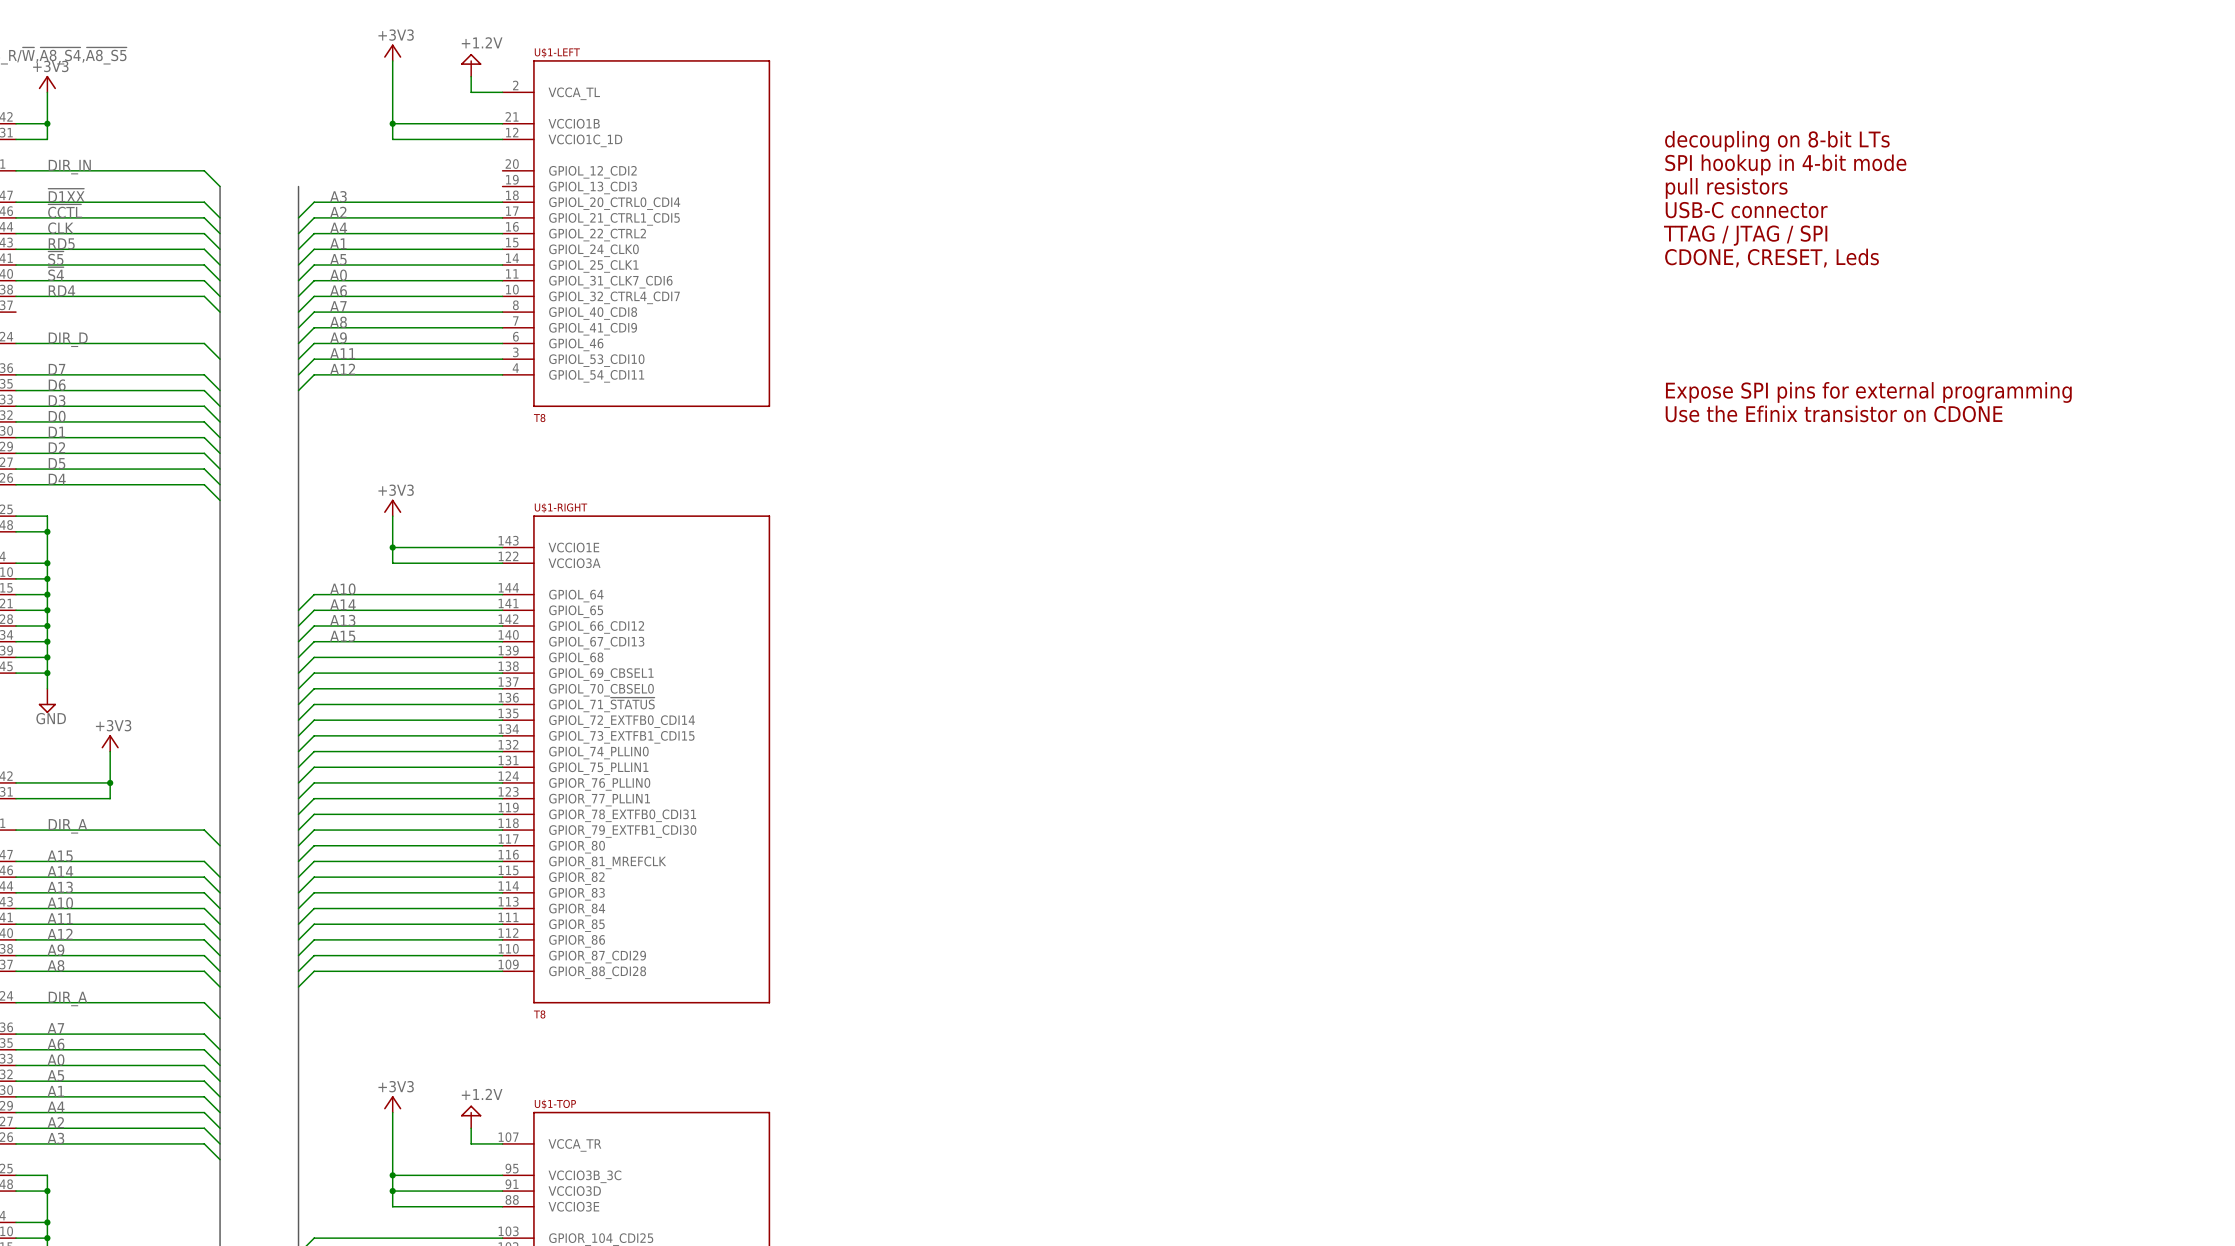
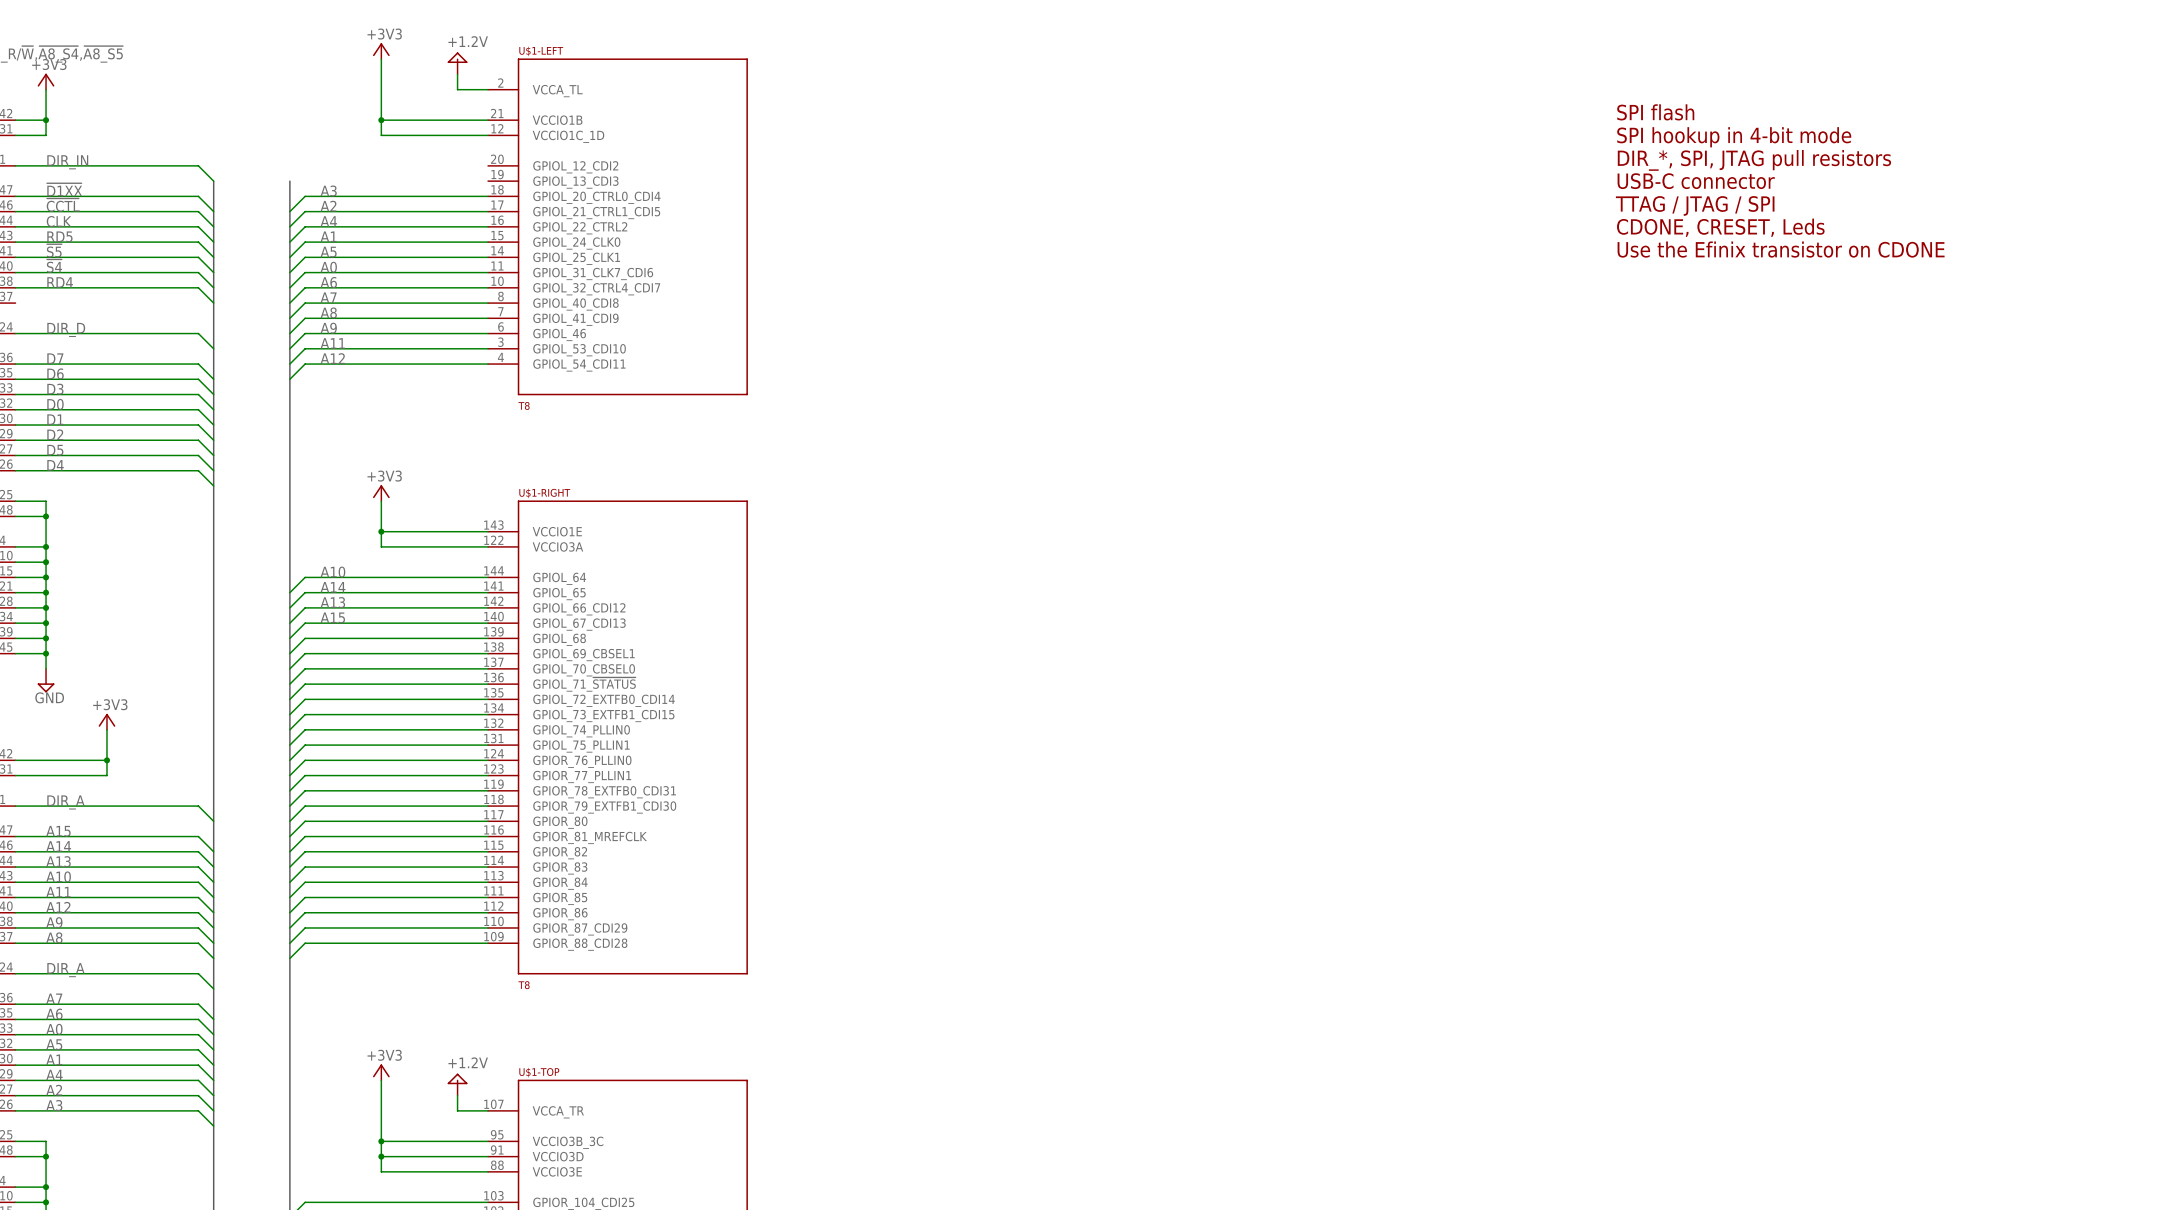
text: none -> SPI flash (1655, 112)
text: decoupling on 8-bit LTs (1777, 141) -> SPI hookup in 4-bit mode (1734, 137)
text: SPI hookup in 4-bit mode (1785, 164) -> DIR_*, SPI, JTAG pull resistors (1754, 160)
text: pull resistors (1726, 188) -> USB-C connector (1696, 181)
text: USB-C connector (1746, 210) -> TTAG / JTAG / SPI (1695, 205)
text: TTAG / JTAG / SPI (1745, 235) -> CDONE, CRESET, Leds (1720, 227)
text: CDONE, CRESET, Leds (1772, 258) -> Use the Efinix transistor on CDONE (1781, 249)
text: Expose SPI pins for external programming (1868, 392) -> none
text: Use the Efinix transistor on CDONE (1834, 413) -> none

